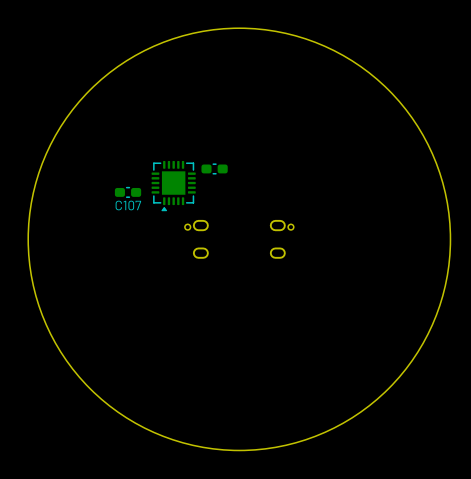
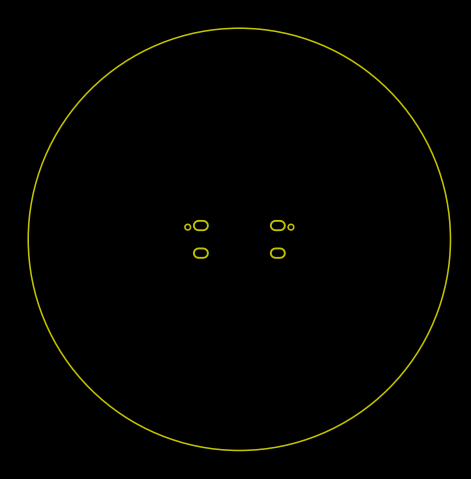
part: (214, 168) -> none
part: (173, 186) -> none
C107: (128, 192) -> none

